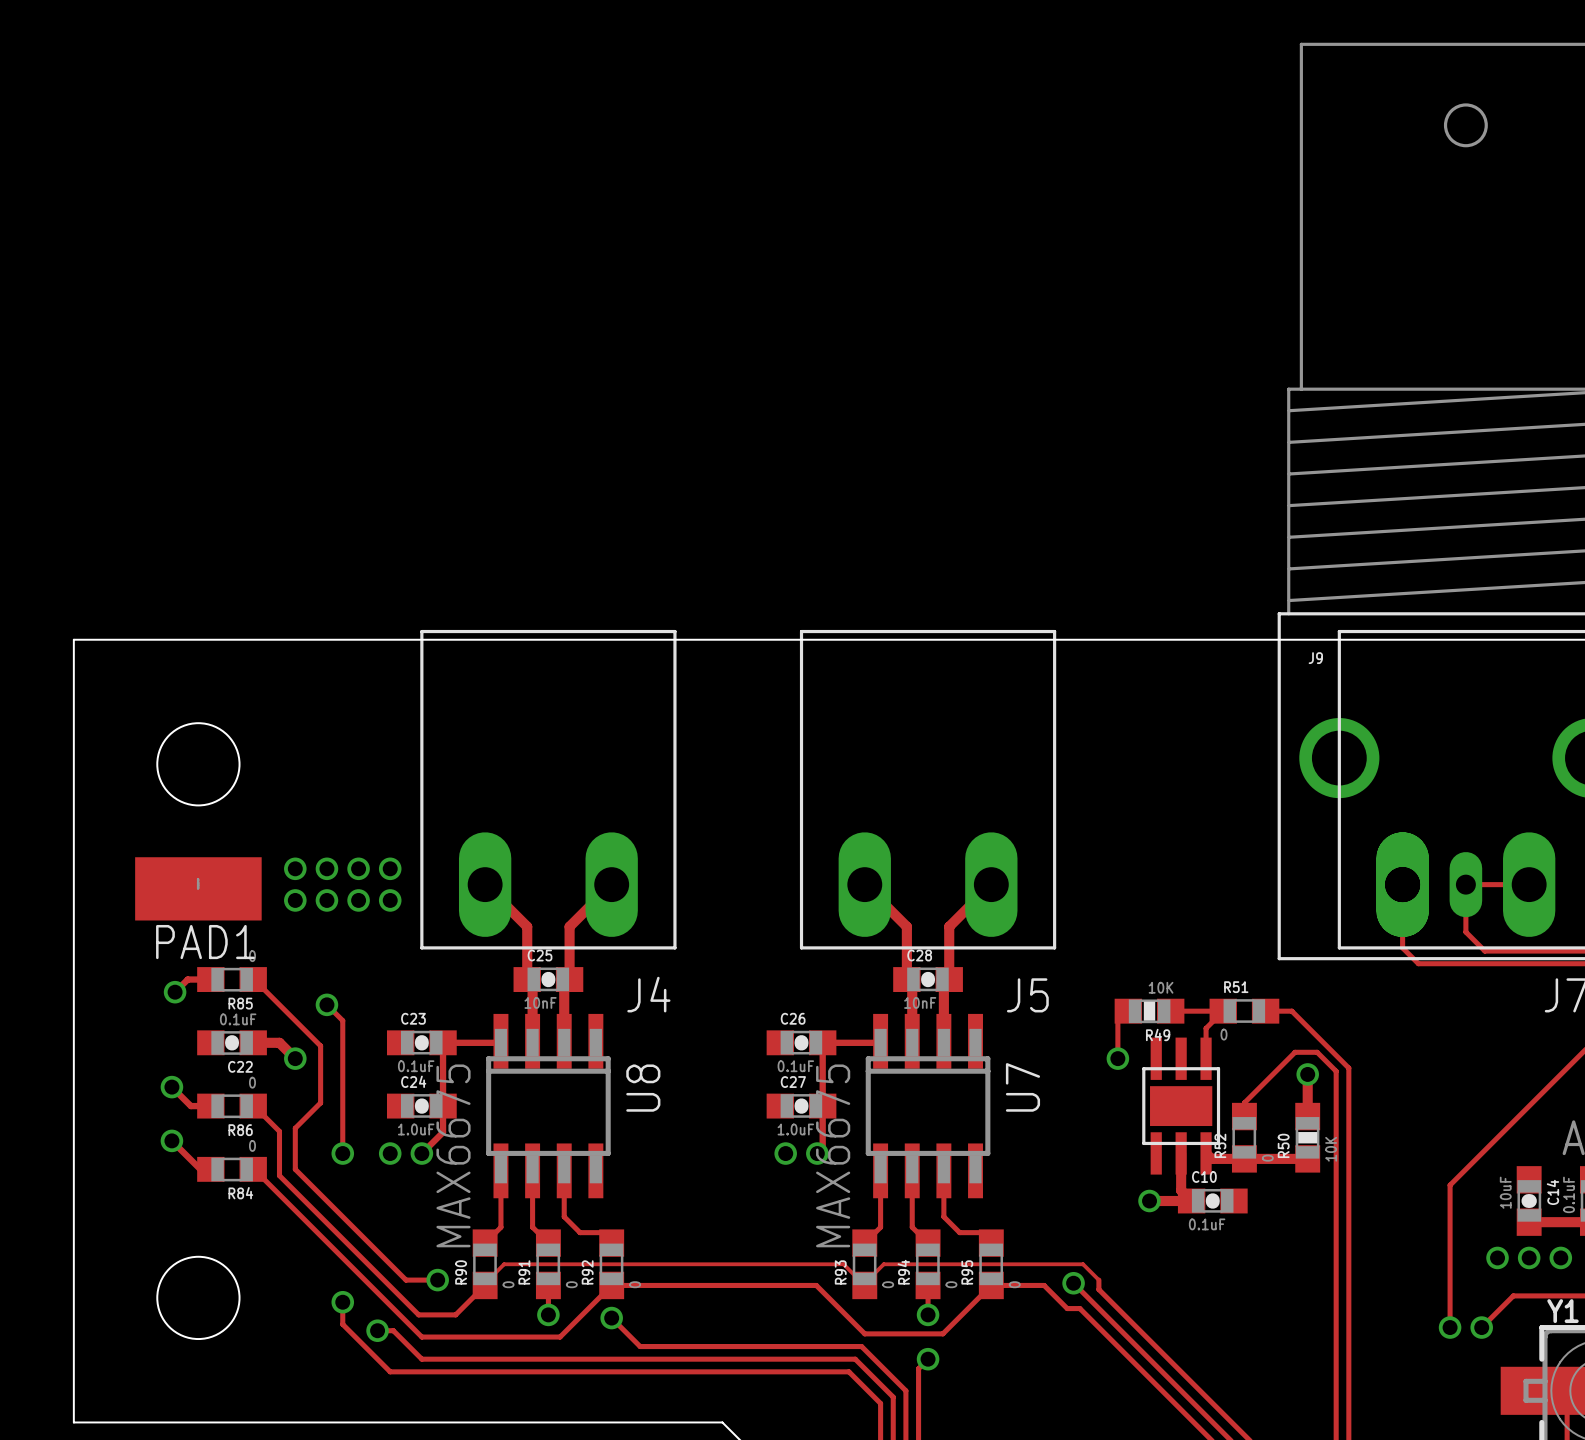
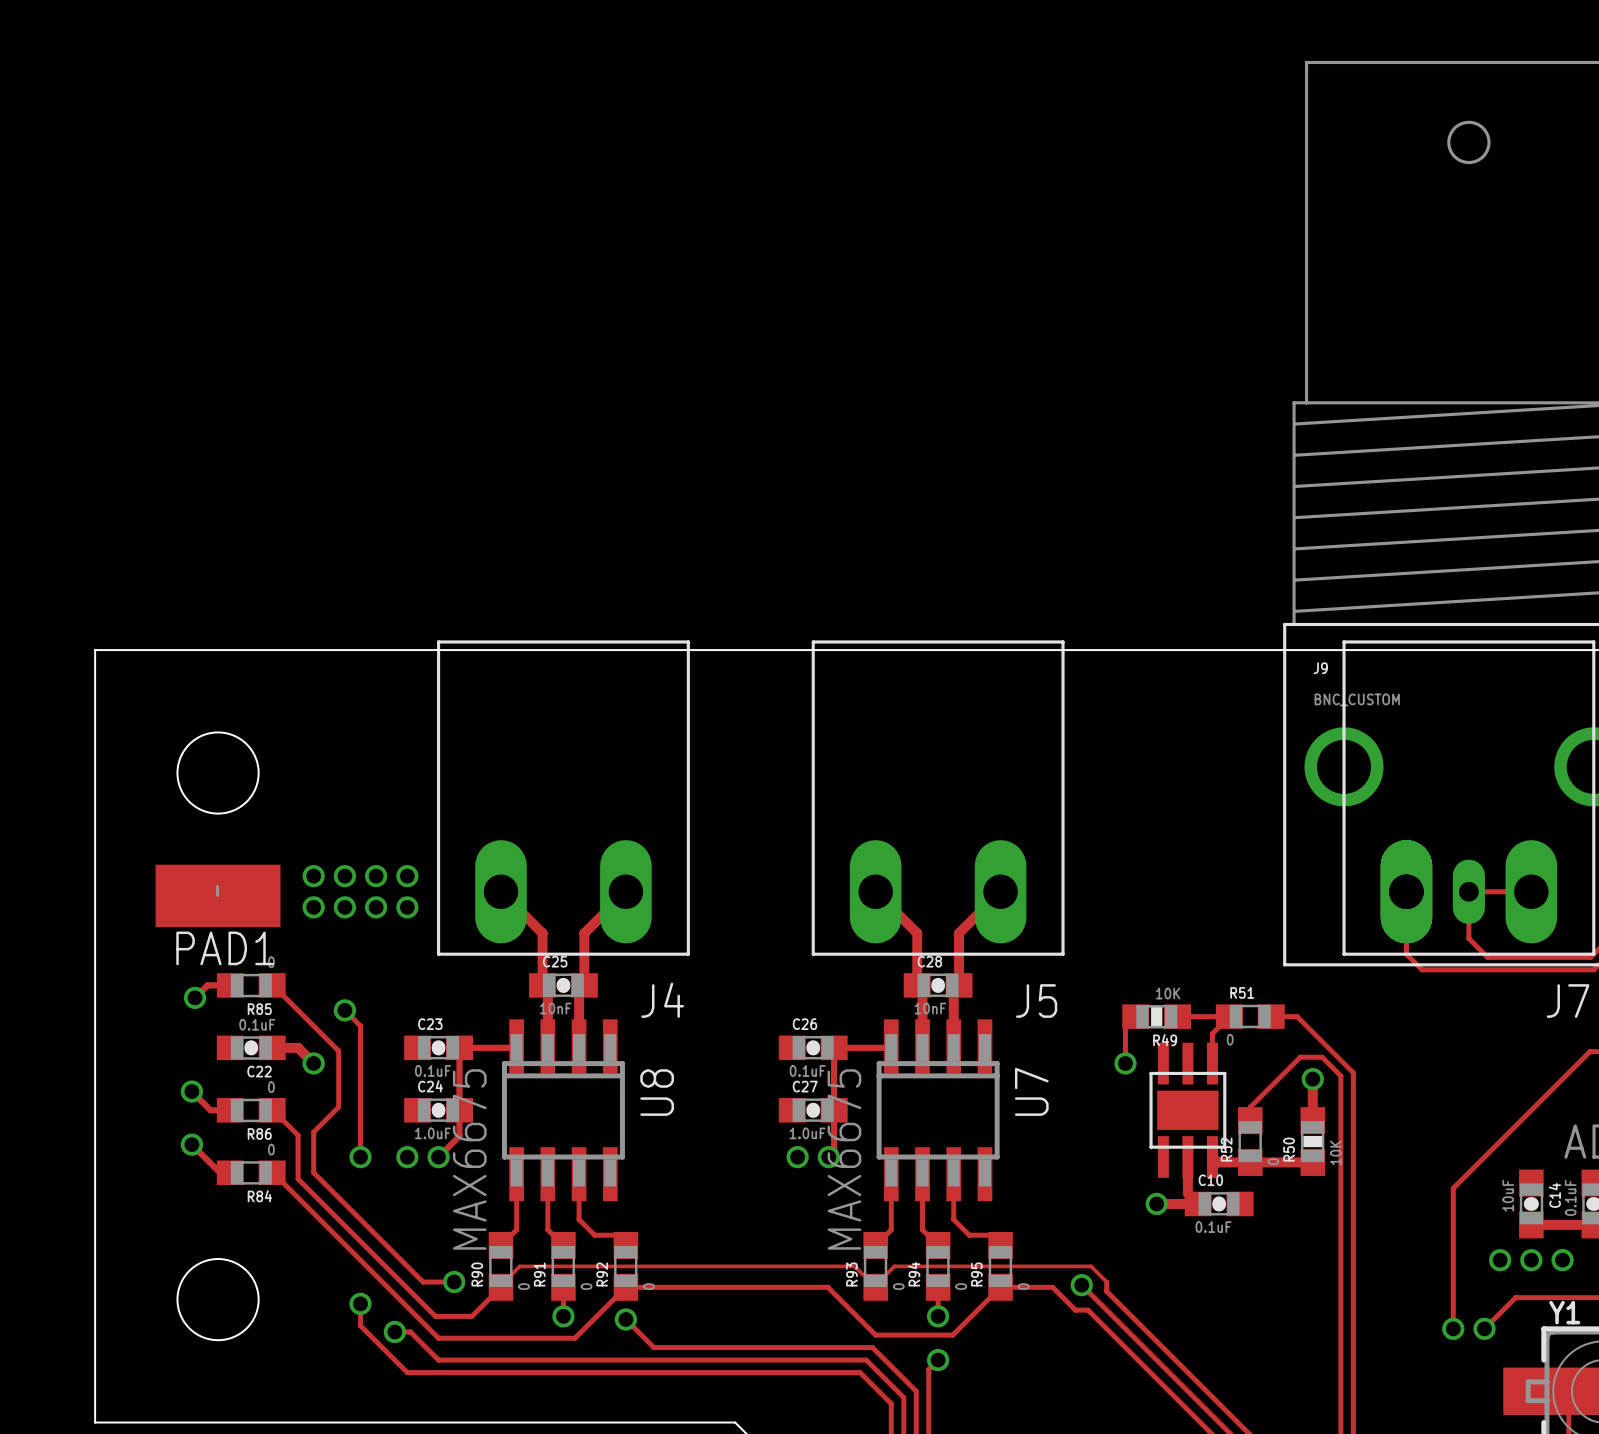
J9 value: none -> BNC_CUSTOM (1357, 699)

